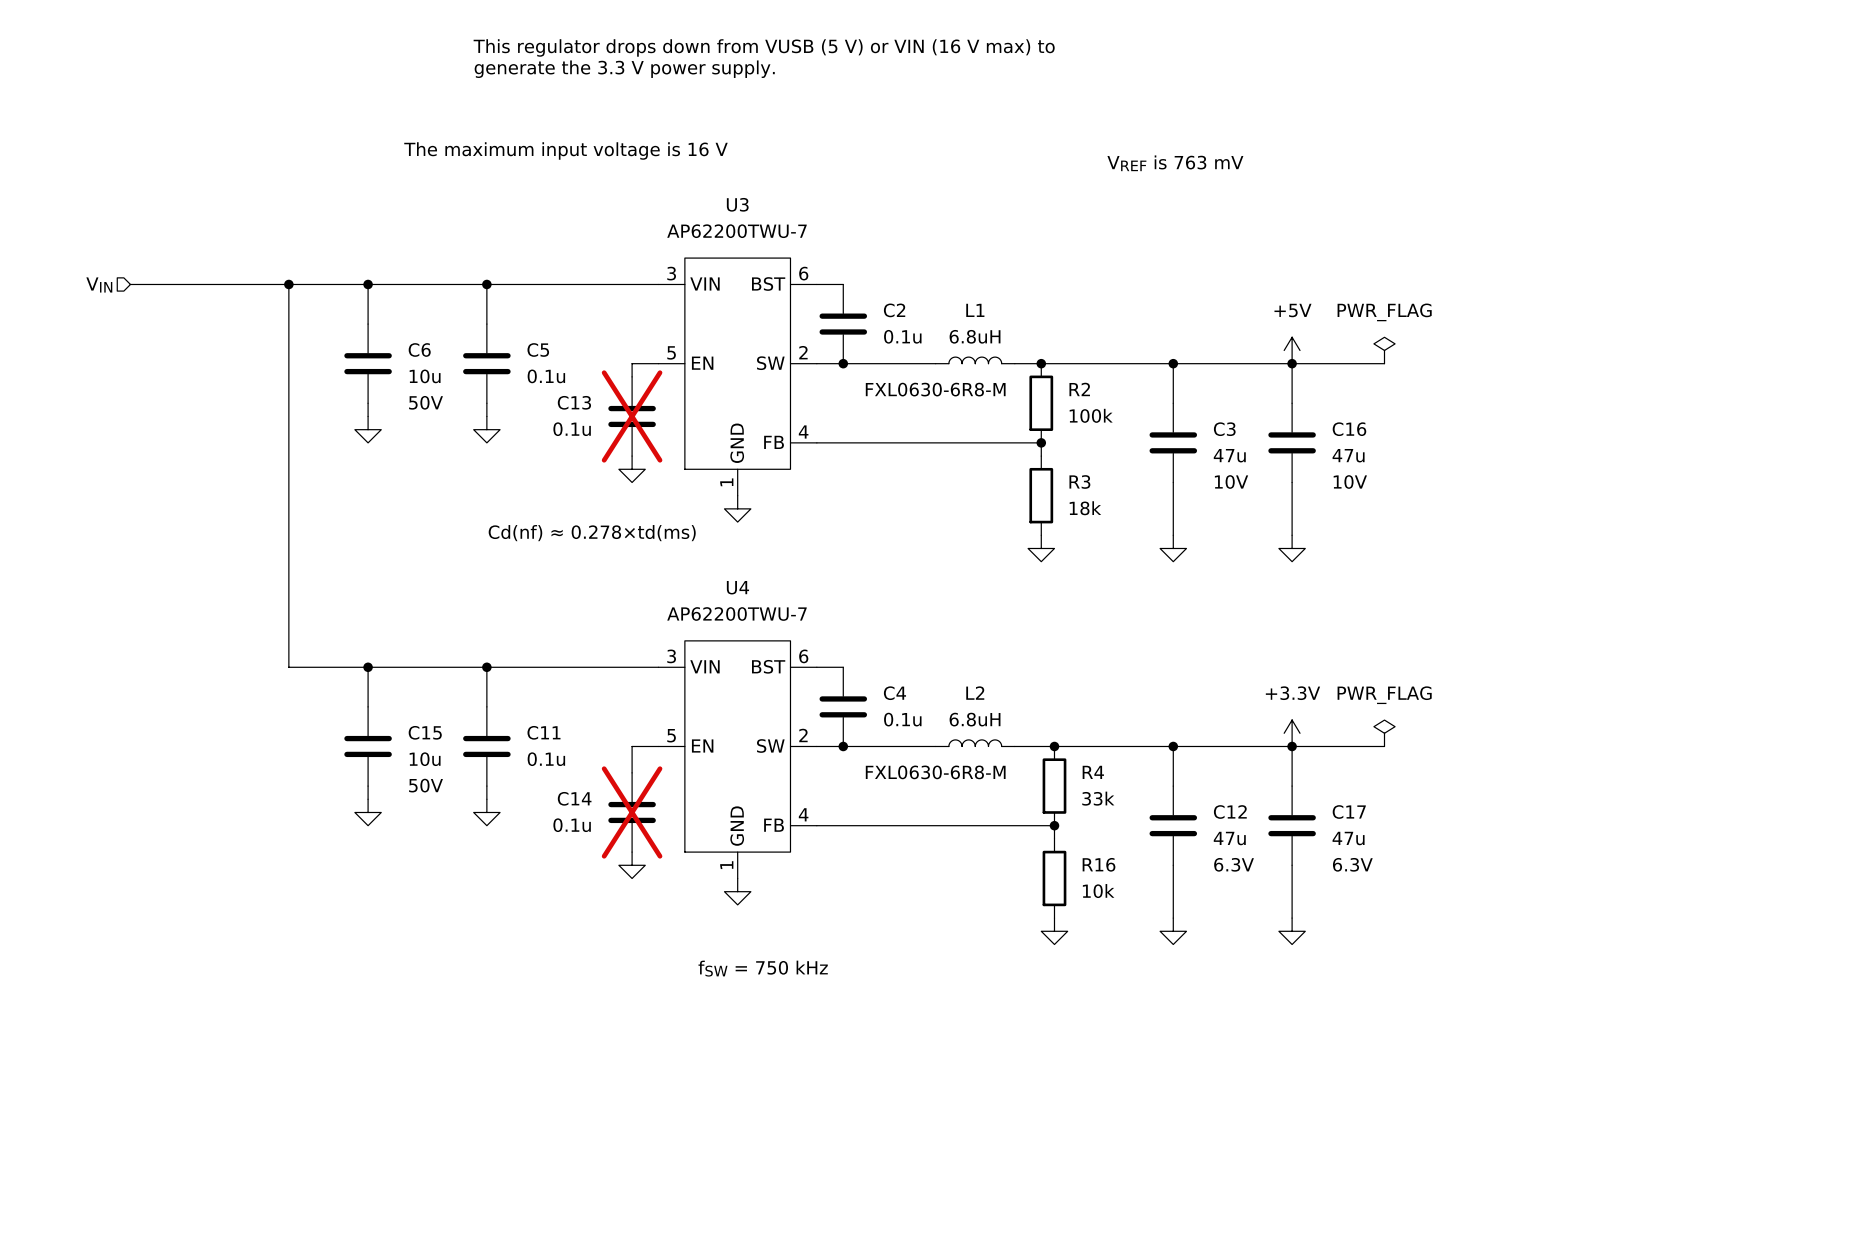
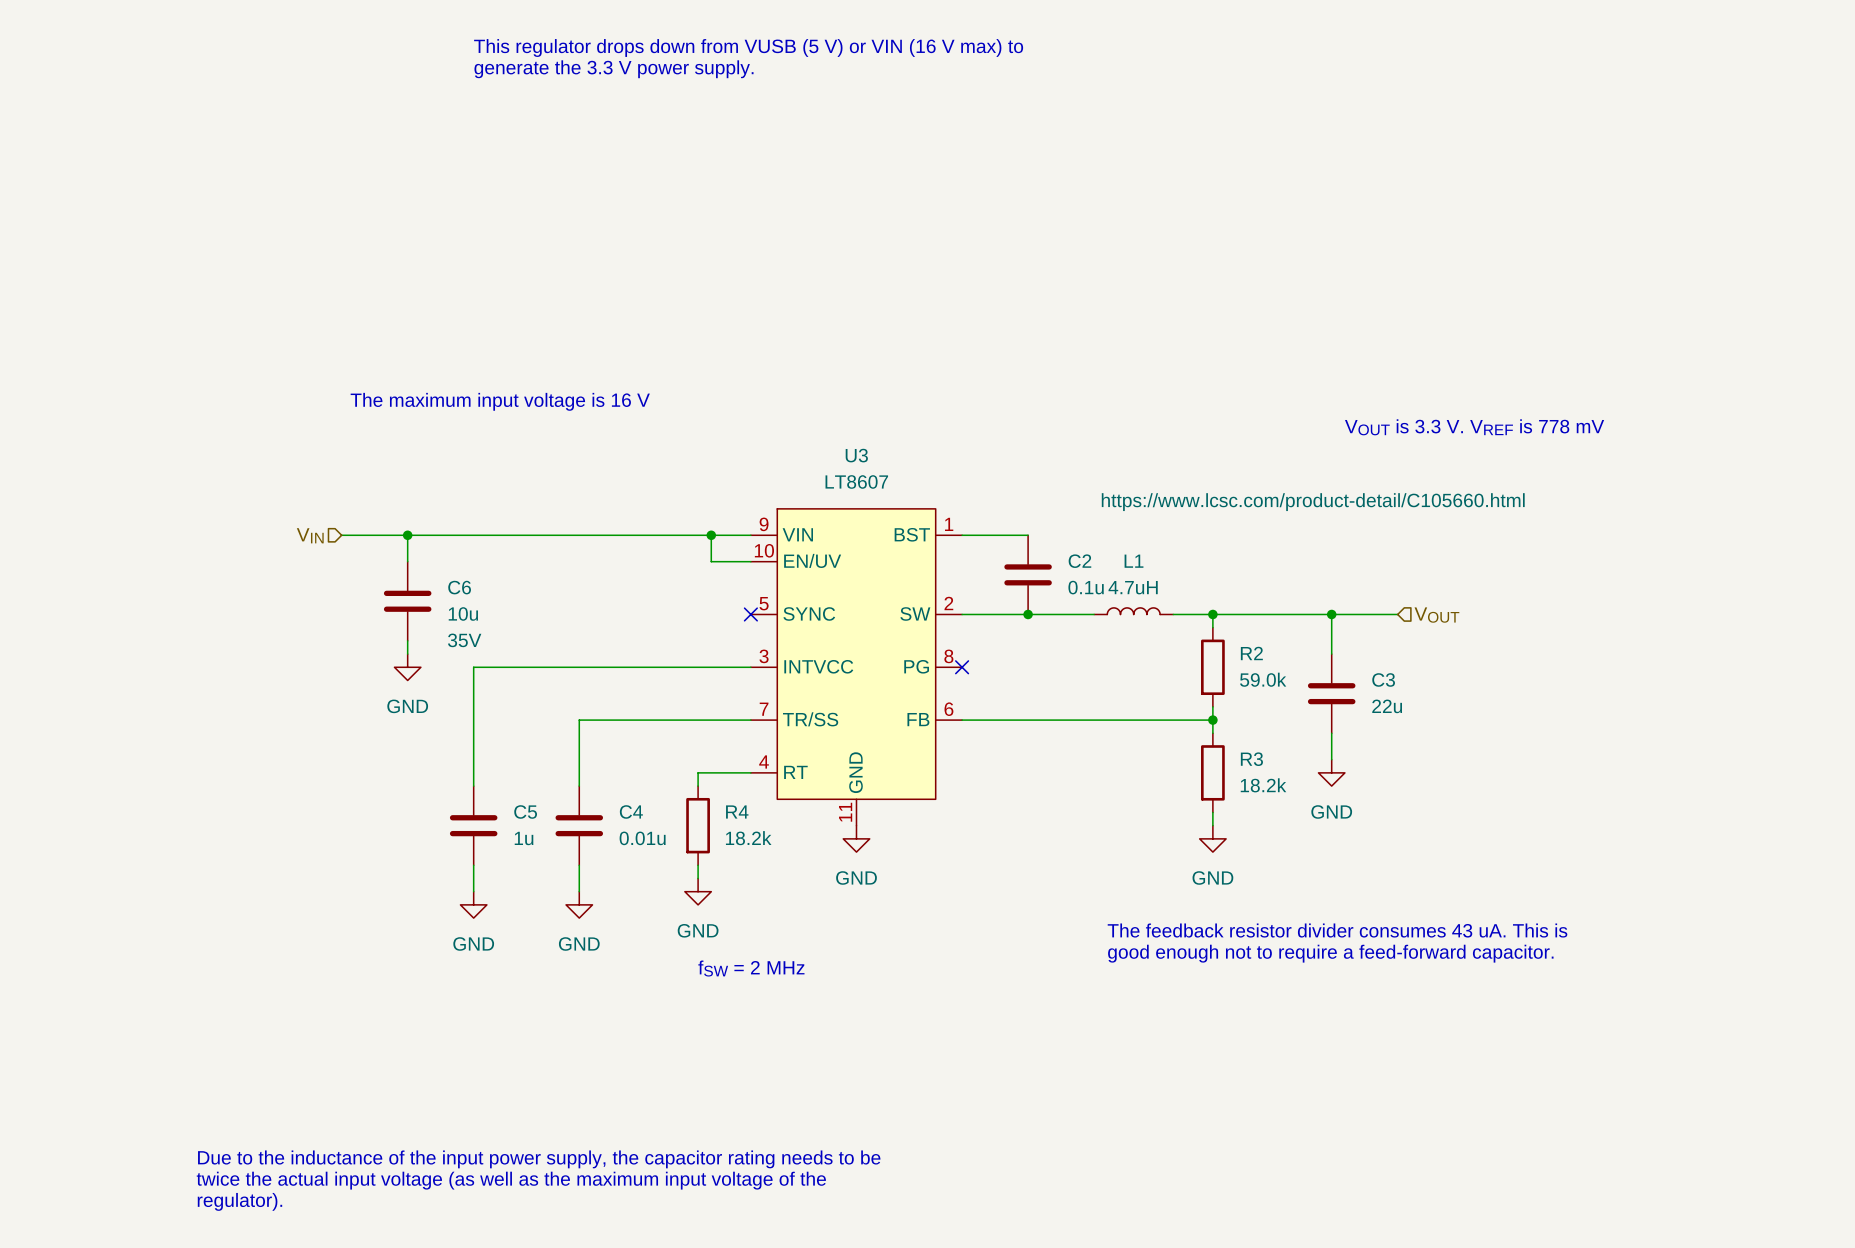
text position: The maximum input voltage is 16 V (565, 150) -> The maximum input voltage is 16 V (500, 401)
text: VREF is 763 mV (1175, 163) -> none
U3 name position: U3 (737, 204) -> U3 (856, 455)
U3 value: AP62200TWU-7 (736, 231) -> LT8607 (856, 481)
U3 symbol: [658, 258, 817, 496] -> [750, 508, 963, 826]
hierarchical label: VIN (99, 284) -> none
wire: (130, 284) (658, 284) -> none
wire: (288, 284) (288, 667) (473, 667) -> (473, 786) (473, 667)
junction: (288, 284) -> none
wire: (368, 284) (368, 324) -> none
junction: (368, 284) -> none
wire: (486, 284) (486, 324) -> none
junction: (486, 284) -> none
wire: (816, 284) (843, 284) -> none
C2 position: (843, 324) -> (1028, 574)
L1 value: 6.8uH (975, 336) -> 4.7uH (1133, 587)
power symbol: +5V (1292, 350) -> none
power symbol: PWR_FLAG (1384, 350) -> none
L1 position: (975, 360) -> (1133, 611)
C6 position: (368, 363) -> (407, 601)
C5 position: (486, 363) -> (473, 825)
wire: (658, 363) (632, 363) (632, 376) -> none
wire: (816, 363) (935, 363) -> none
junction: (843, 363) -> none
wire: (1014, 363) (1384, 363) -> none
junction: (1041, 363) -> none
wire: (1173, 363) (1173, 403) -> none
junction: (1173, 363) -> none
wire: (1292, 363) (1292, 403) -> none
junction: (1292, 363) -> none
C5 value: 0.1u (546, 376) -> 1u (524, 838)
L1 text: FXL0630-6R8-M (935, 389) -> none
C6 text: 50V (426, 402) -> 35V (464, 640)
wire: (368, 403) (368, 416) -> none
wire: (486, 403) (486, 416) -> none
R2 position: (1041, 403) -> (1212, 667)
R2 value: 100k (1091, 415) -> 59.0k (1263, 679)
C13: 0.1u (632, 416) -> none
text: none -> VOUT is 3.3 V. VREF is 778 mV (1474, 427)
power symbol: (368, 429) -> none
power symbol: (486, 429) -> none
wire: (816, 442) (1041, 442) (1041, 456) -> none
junction: (1041, 442) -> none
C3 position: (1173, 442) -> (1331, 693)
C16: 47u (1292, 442) -> none
C3 value: 47u (1229, 455) -> 22u (1387, 706)
power symbol: (632, 469) -> none
C3 text: 10V (1231, 481) -> none
wire: (1173, 482) (1173, 535) -> none
wire: (1292, 482) (1292, 535) -> none
R3 position: (1041, 495) -> (1212, 772)
L1 text: none -> https://www.lcsc.com/product-detail/C105660.html (1313, 502)
power symbol: (737, 508) -> none
R3 value: 18k (1085, 508) -> 18.2k (1263, 785)
text: Cd(nf) ≈ 0.278×td(ms) (592, 533) -> none
hierarchical label: none -> VIN (310, 535)
wire: none -> (341, 535) (750, 535)
wire: none -> (407, 535) (407, 561)
junction: none -> (407, 535)
wire: none -> (711, 535) (711, 561) (750, 561)
junction: none -> (711, 535)
wire: none -> (962, 535) (1028, 535)
power symbol: (1041, 548) -> none
power symbol: (1173, 548) -> none
power symbol: (1292, 548) -> none
no-connect mark: none -> (750, 614)
wire: none -> (962, 614) (1094, 614)
junction: none -> (1028, 614)
wire: none -> (1173, 614) (1397, 614)
wire: none -> (1212, 614) (1212, 627)
junction: none -> (1212, 614)
junction: none -> (1331, 614)
hierarchical label: none -> VOUT (1436, 615)
wire: (368, 667) (368, 706) -> none
junction: (368, 667) -> none
power symbol: none -> GND (407, 667)
wire: (486, 667) (486, 706) -> none
junction: (486, 667) -> none
wire: none -> (658, 667) (750, 667)
no-connect mark: none -> (962, 667)
C4 position: (843, 706) -> (579, 825)
wire: none -> (1212, 706) (1212, 733)
C4 value: 0.1u (902, 719) -> 0.01u (642, 838)
wire: none -> (750, 720) (579, 720) (579, 786)
wire: none -> (962, 720) (1212, 720)
junction: none -> (1212, 720)
power symbol: +3.3V (1292, 733) -> none
wire: none -> (1331, 733) (1331, 759)
power symbol: PWR_FLAG (1384, 733) -> none
L2: 6.8uH (975, 743) -> none
C15: 10u (368, 746) -> none
C11: 0.1u (486, 746) -> none
wire: (658, 746) (632, 746) (632, 772) -> none
junction: (843, 746) -> none
wire: (1014, 746) (1384, 746) -> none
junction: (1054, 746) -> none
wire: (1173, 746) (1173, 786) -> none
junction: (1173, 746) -> none
wire: (1292, 746) (1292, 786) -> (1331, 614) (1331, 654)
junction: (1292, 746) -> none
U4: AP62200TWU-7 (737, 759) -> none
wire: none -> (750, 772) (698, 772) (698, 786)
power symbol: none -> GND (1331, 772)
wire: (368, 786) (368, 799) -> (407, 640) (407, 654)
wire: (486, 786) (486, 799) -> (698, 865) (698, 878)
R4 position: (1054, 786) -> (698, 825)
R4 value: 33k (1098, 798) -> 18.2k (748, 838)
power symbol: (368, 812) -> none
power symbol: (486, 812) -> none
C14: 0.1u (632, 812) -> none
wire: none -> (1212, 812) (1212, 825)
wire: (816, 825) (1054, 825) (1054, 838) -> none
junction: (1054, 825) -> none
C12: 47u (1173, 825) -> none
C17: 47u (1292, 825) -> none
power symbol: none -> GND (856, 838)
power symbol: none -> GND (1212, 838)
wire: none -> (473, 865) (473, 891)
wire: none -> (579, 865) (579, 891)
power symbol: (632, 865) -> none
wire: (1173, 865) (1173, 918) -> none
wire: (1292, 865) (1292, 918) -> none
R16: 10k (1054, 878) -> none
power symbol: none -> GND (698, 891)
power symbol: (737, 891) -> none
power symbol: none -> GND (473, 904)
power symbol: none -> GND (579, 904)
text: none -> The feedback resistor divider consumes 43 uA. This is (1337, 930)
power symbol: (1054, 931) -> none
power symbol: (1173, 931) -> none
power symbol: (1292, 931) -> none
text: none -> good enough not to require a feed-forward capacitor. (1330, 953)
text: fSW = 750 kHz (763, 968) -> fSW = 2 MHz (751, 968)
text: none -> Due to the inductance of the input power supply, the capacitor rating needs to be (539, 1159)
text: none -> twice the actual input voltage (as well as the maximum input voltage of the (511, 1180)
text: none -> regulator). (239, 1201)

